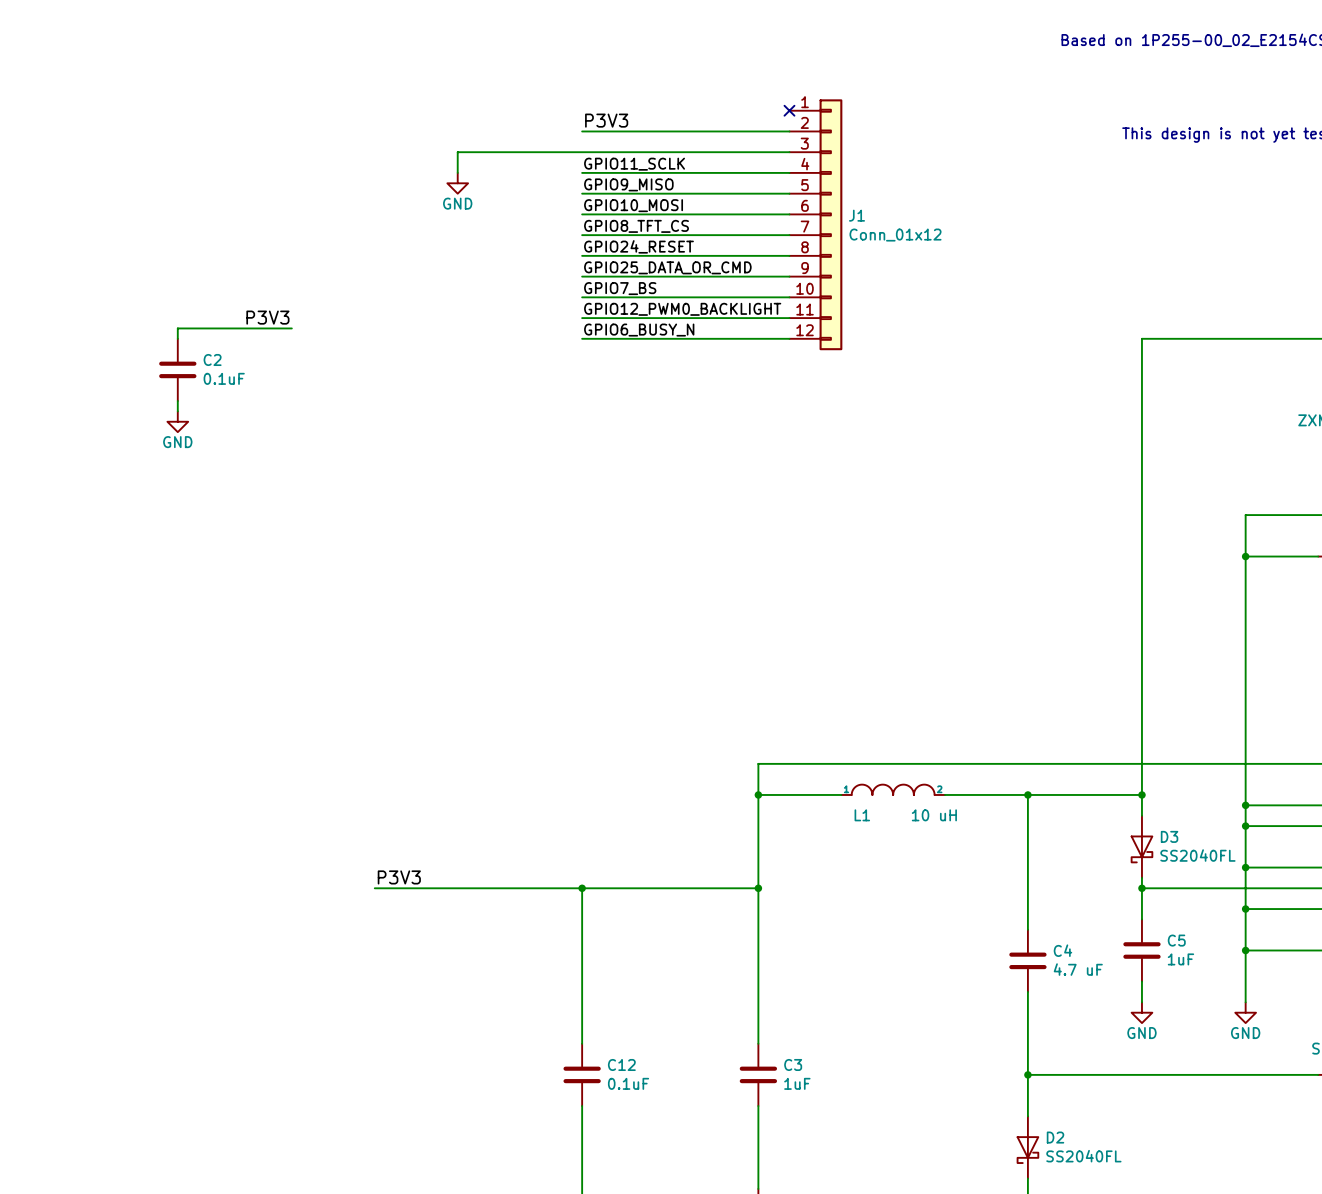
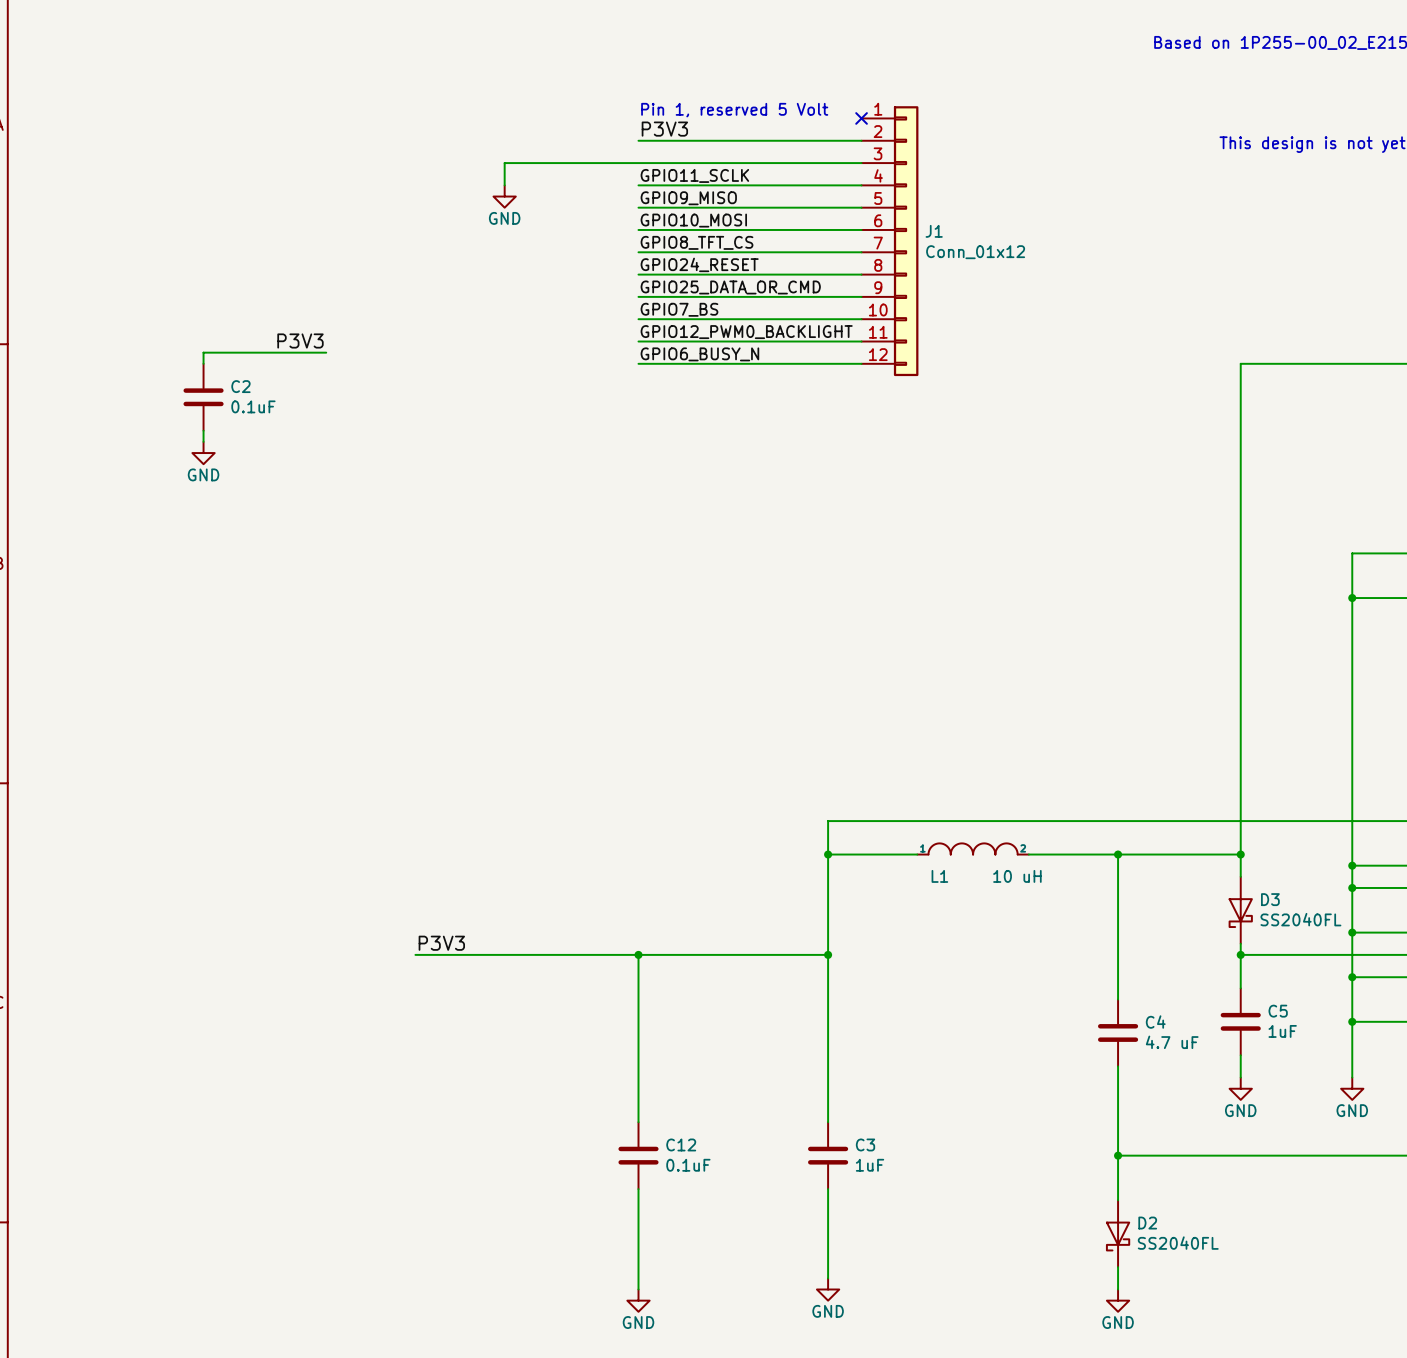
text: none -> Pin 1, reserved 5 Volt (734, 110)

